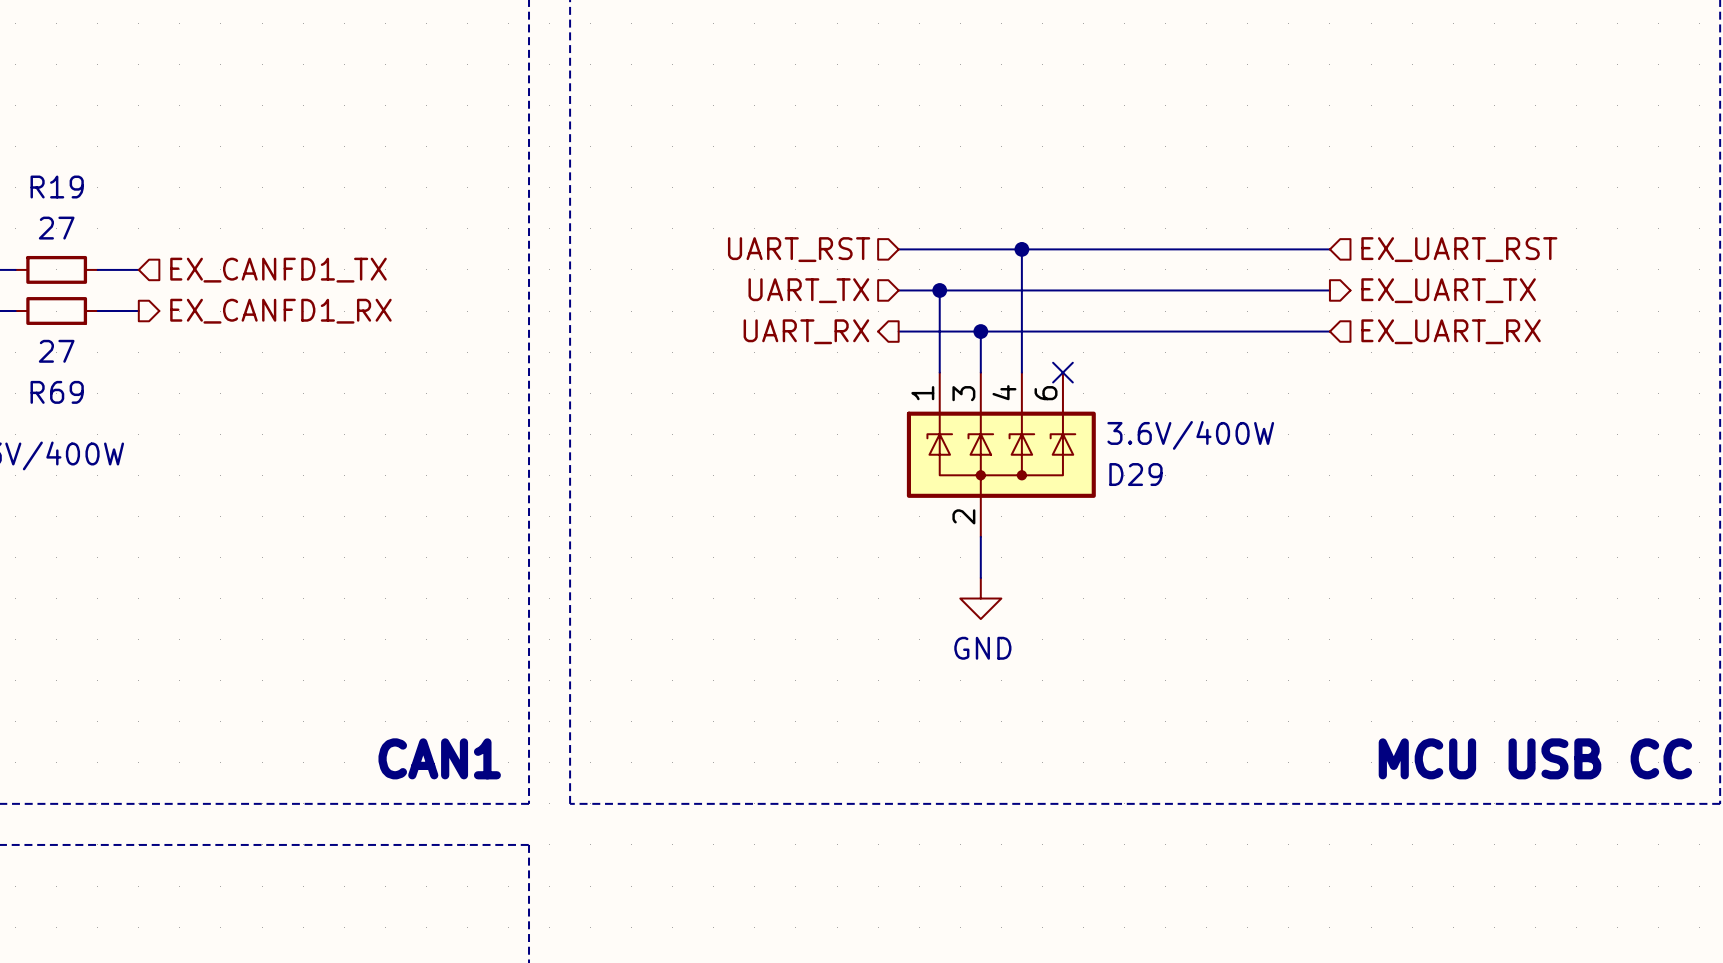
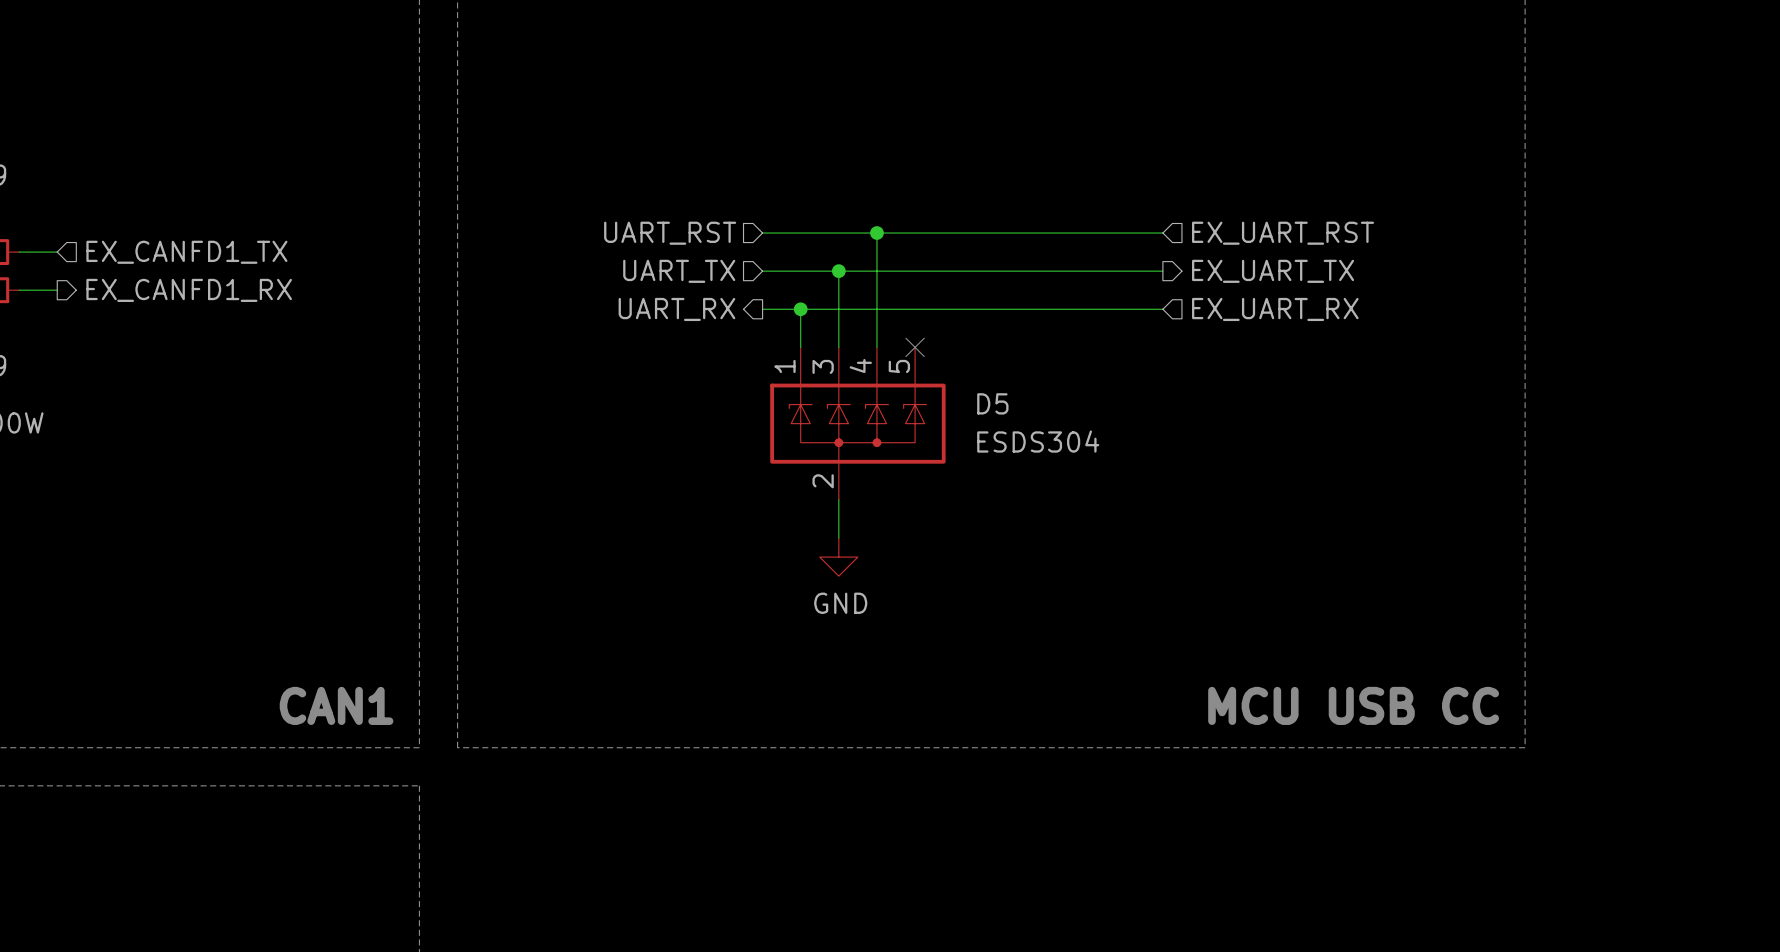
wire: (939, 290) (939, 331) -> (838, 271) (838, 309)
junction: (939, 290) -> none
junction: none -> (838, 271)
junction: none -> (800, 309)
junction: (980, 331) -> none
D29 pin number: 6 (1046, 393) -> 5 (899, 366)
D29 value: 3.6V/400W (1190, 435) -> ESDS304 (1038, 441)
D29 name: D29 (1135, 474) -> D5 (992, 403)

